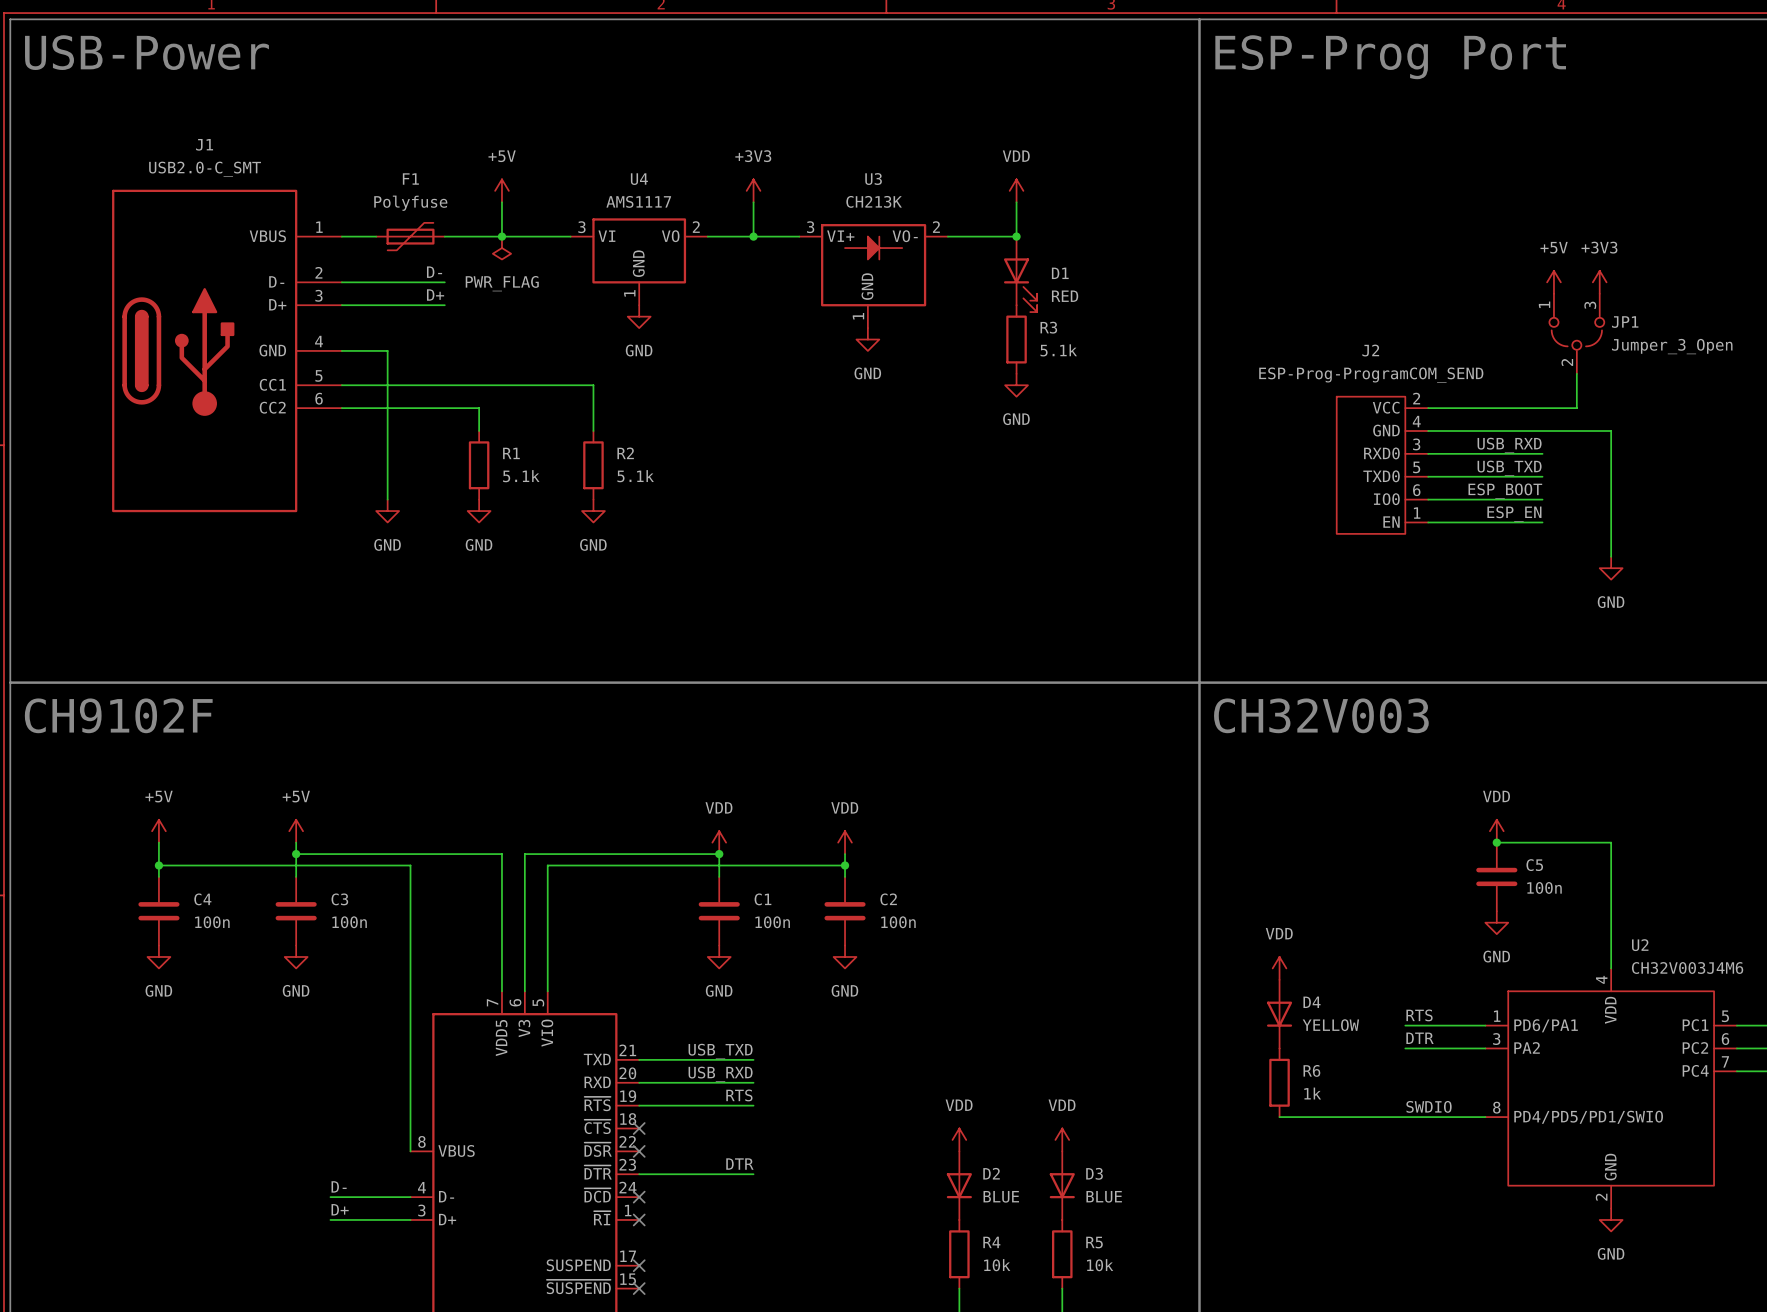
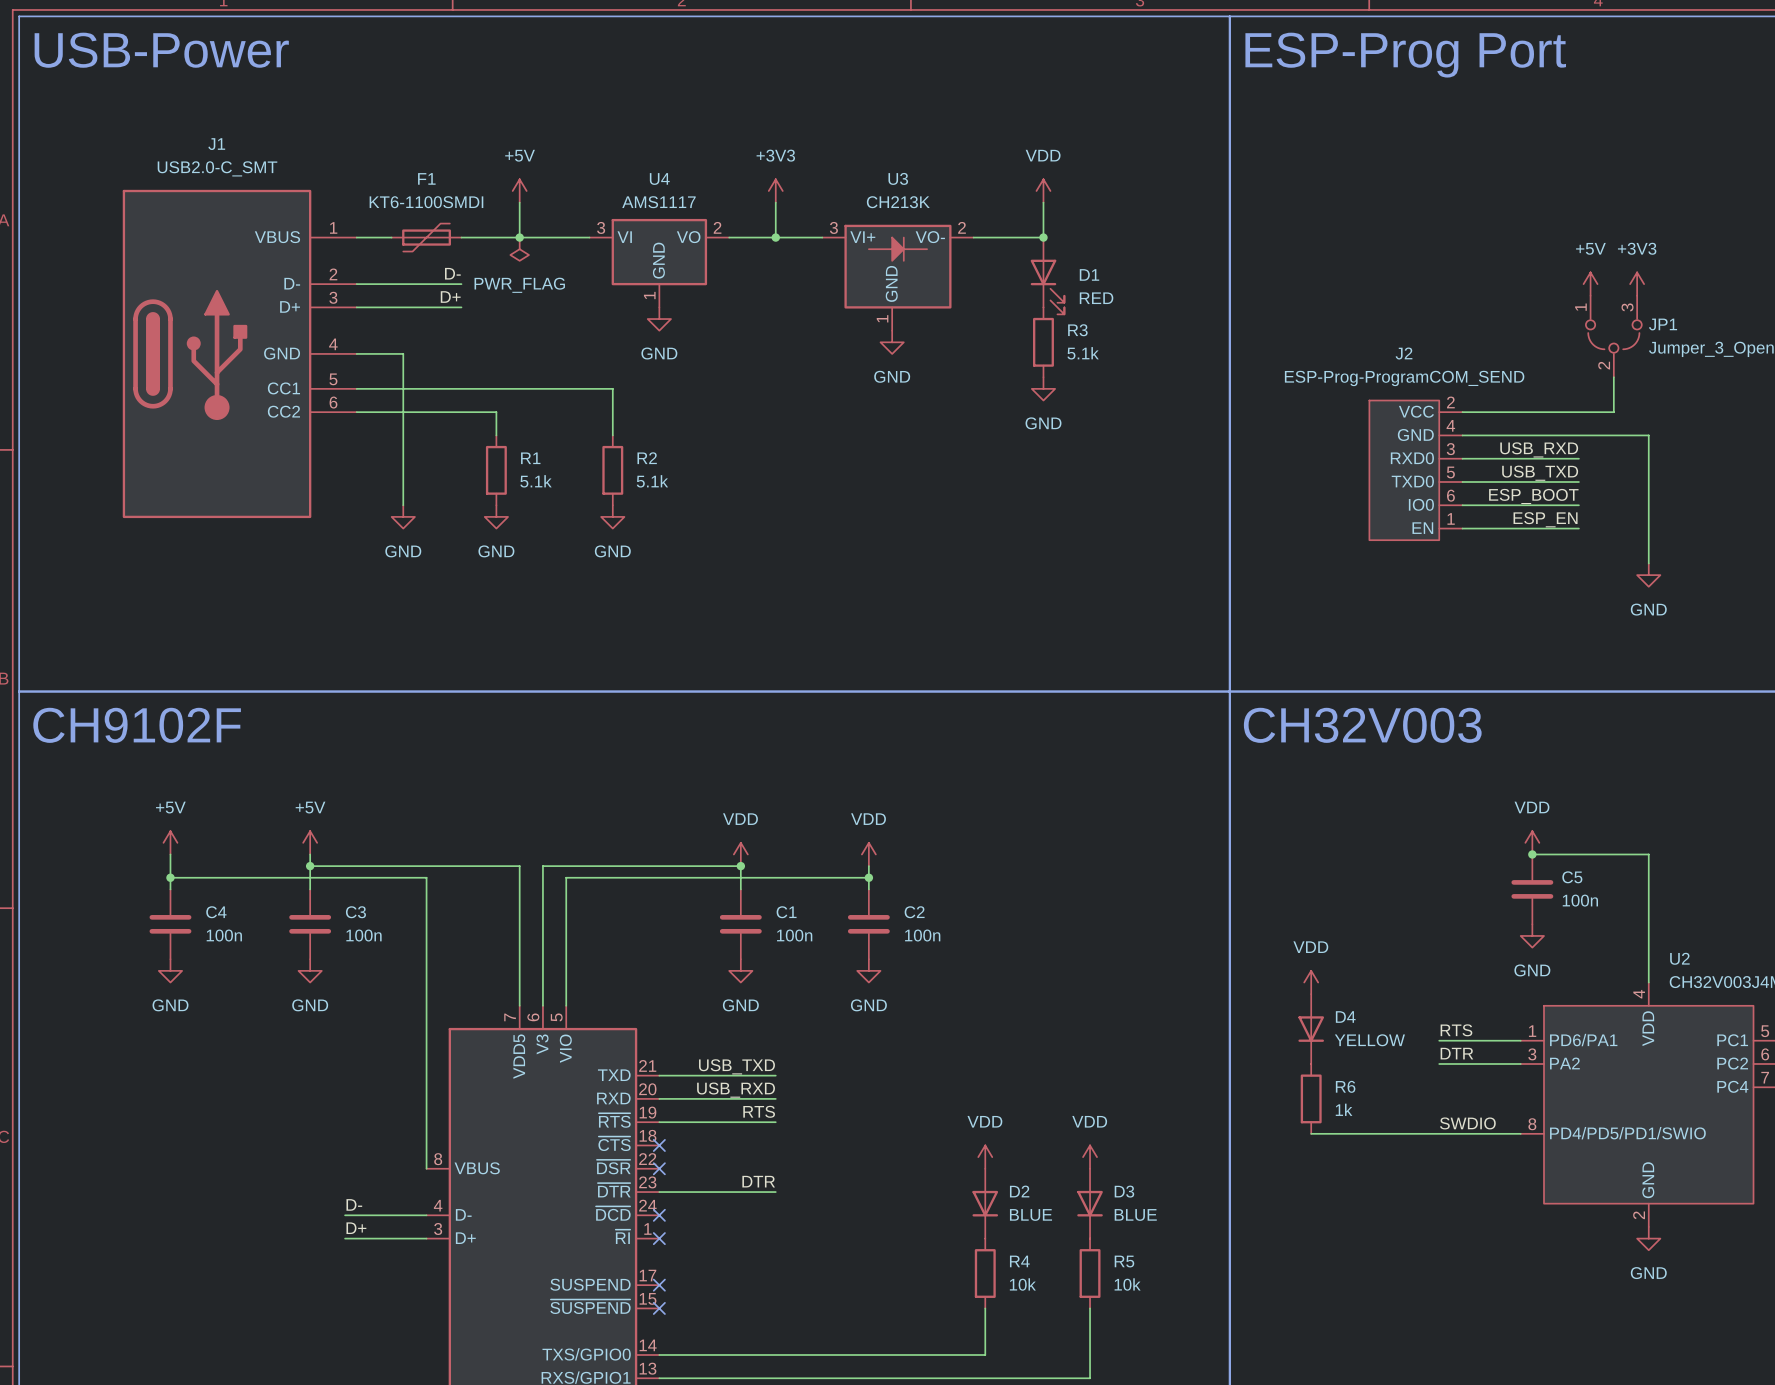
F1 value: Polyfuse (410, 203) -> KT6-1100SMDI (426, 202)

